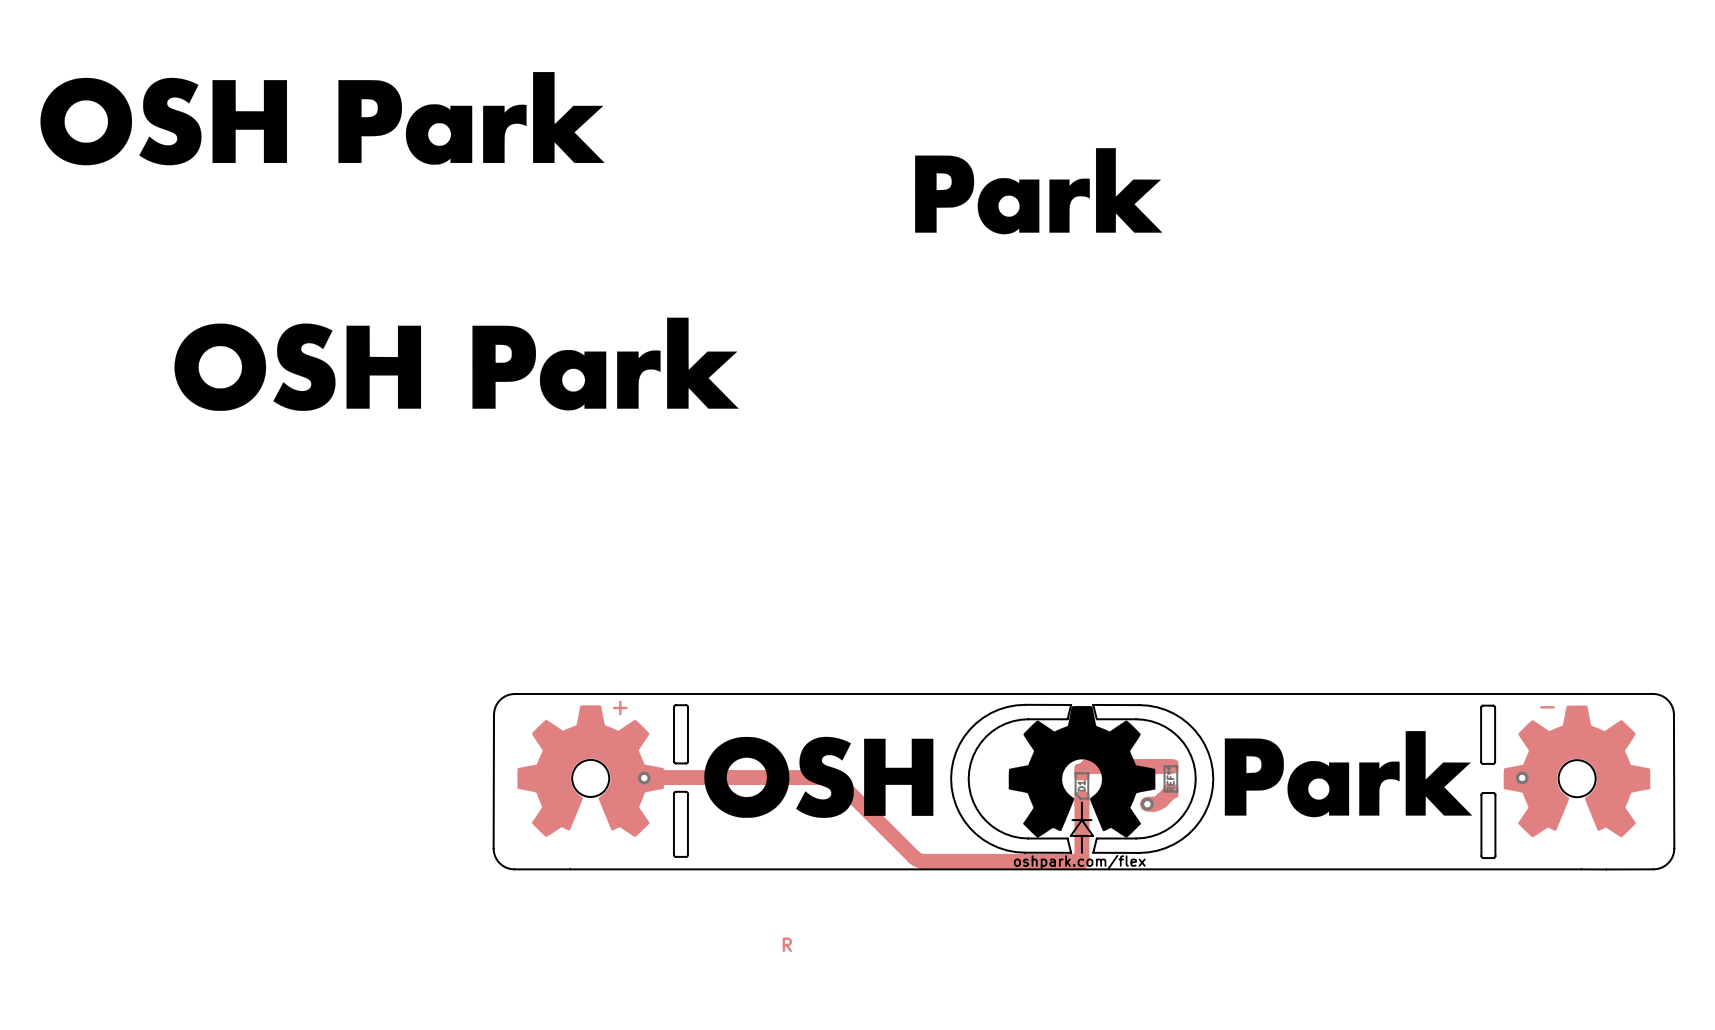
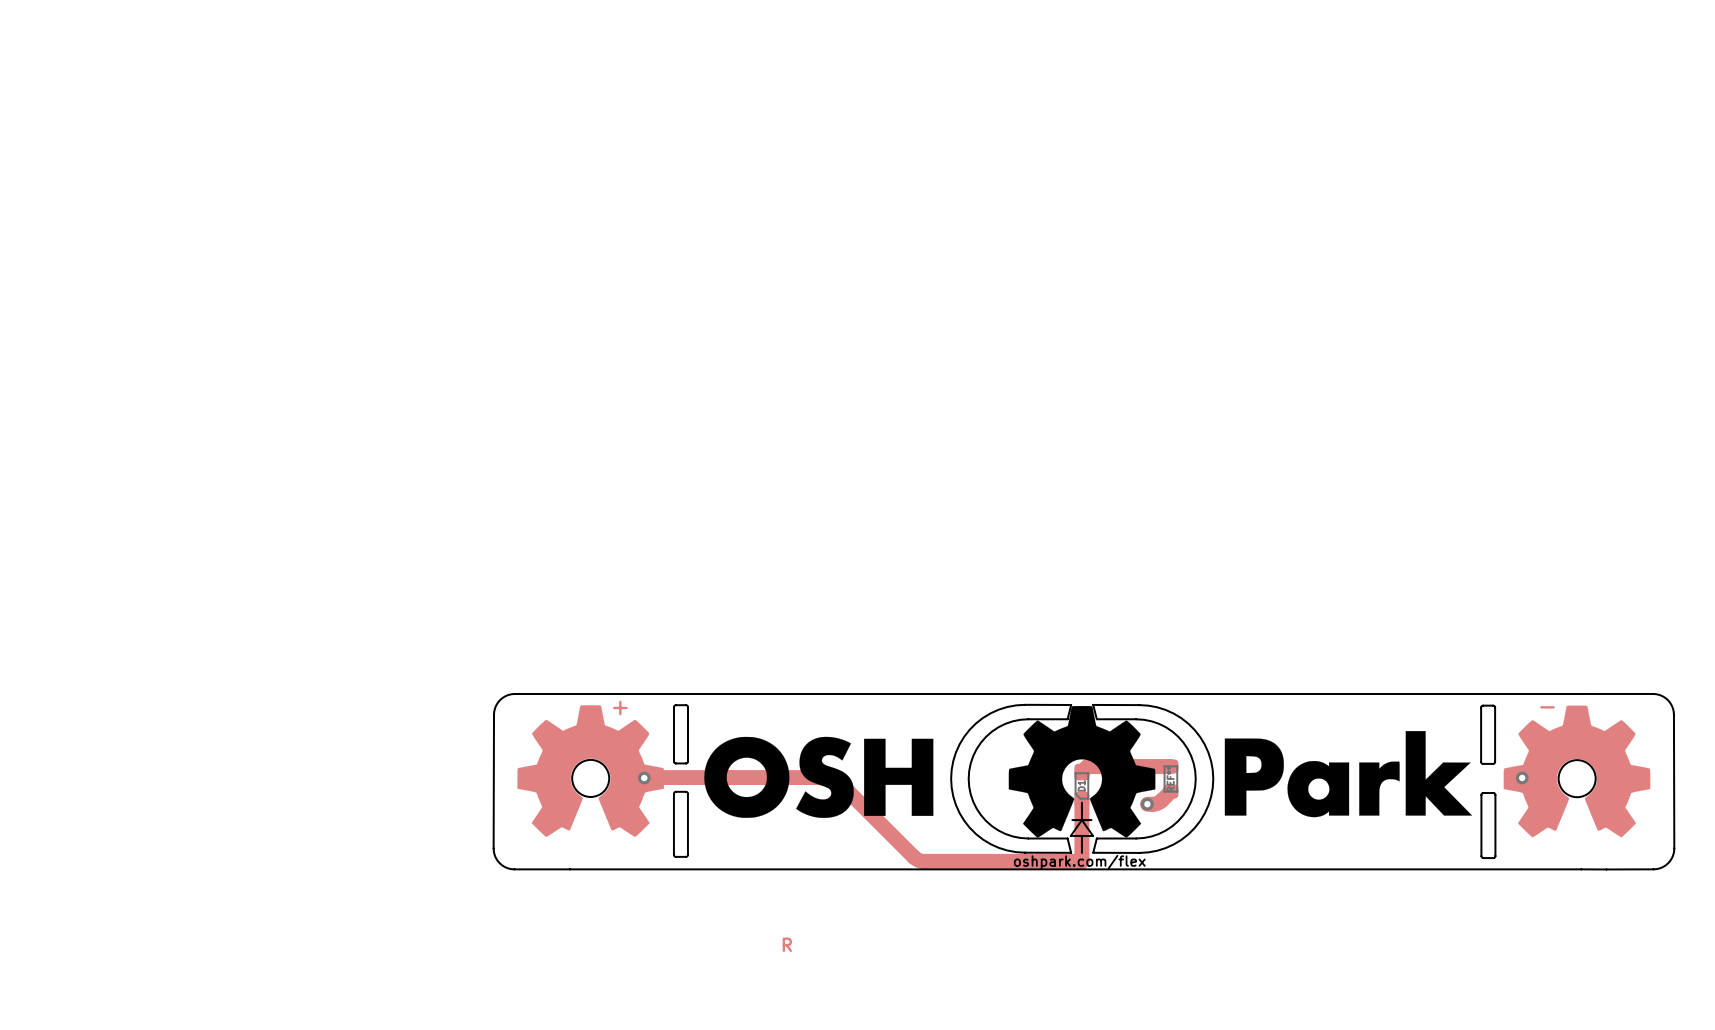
drawing: [40, 72, 605, 166] -> none
drawing: [915, 148, 1163, 235] -> none
drawing: [174, 317, 739, 411] -> none

